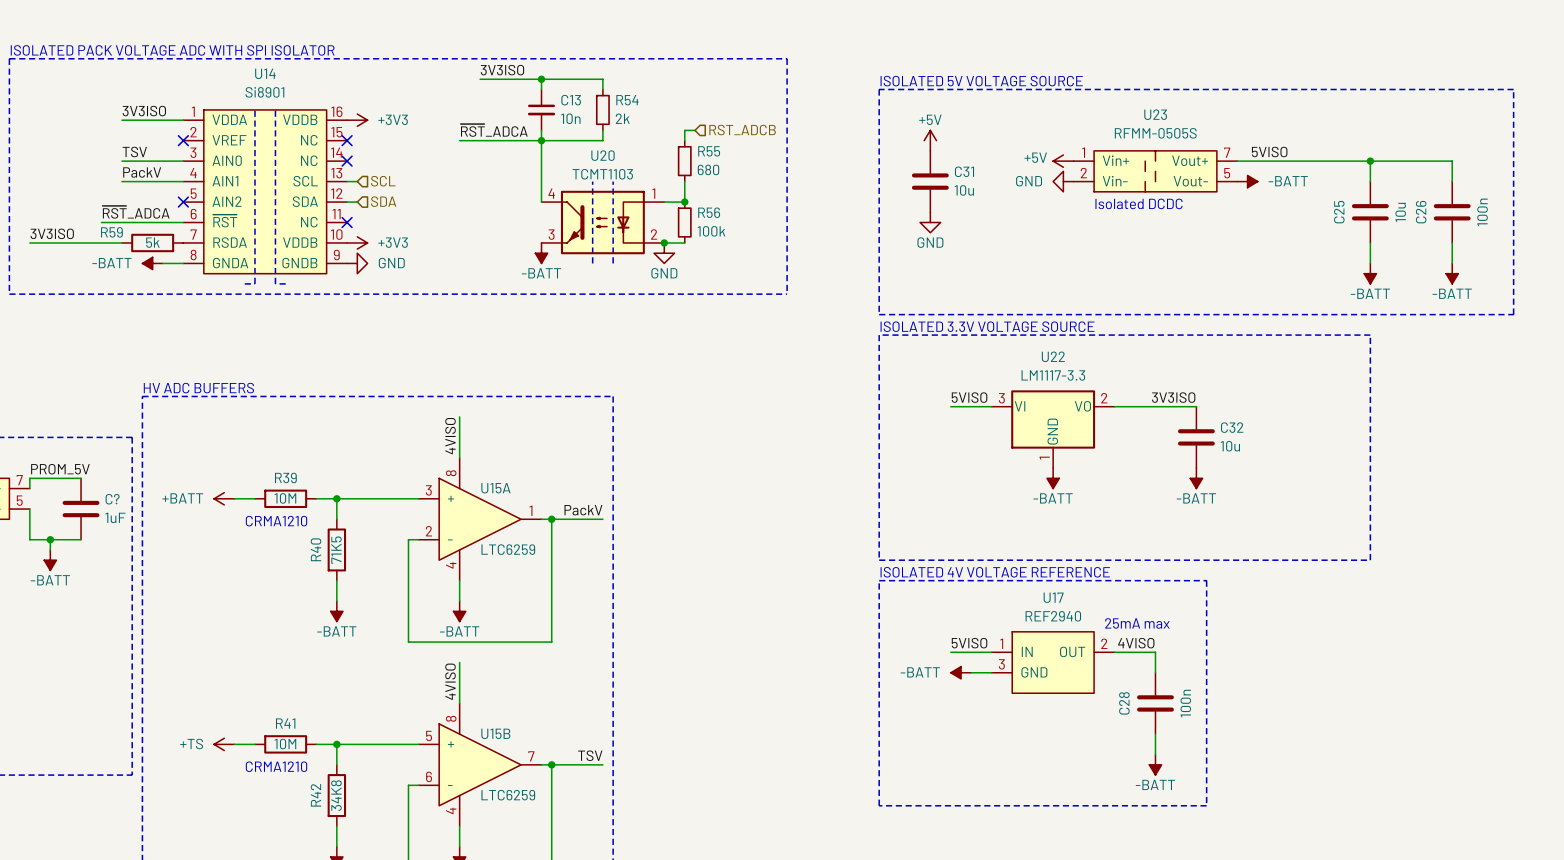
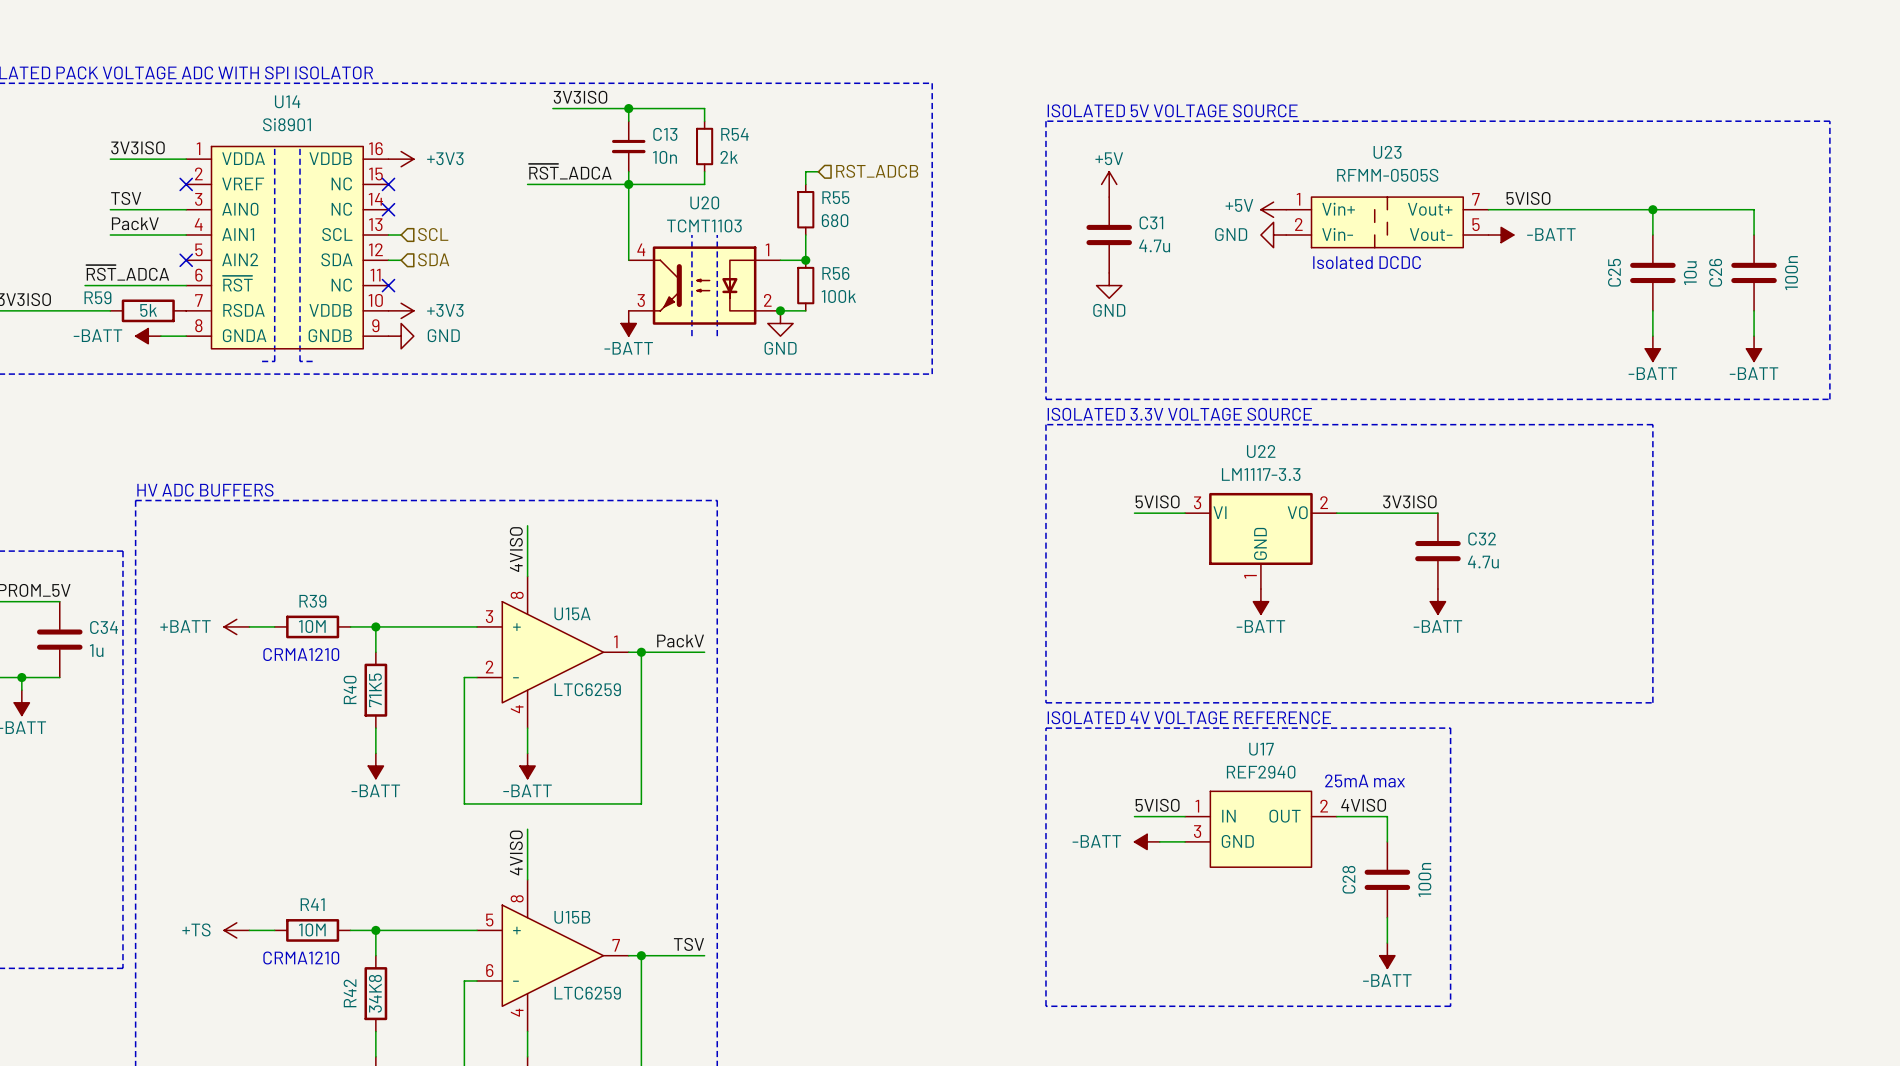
C31 value: 10u (964, 190) -> 4.7u (1154, 245)
C32 value: 10u (1230, 446) -> 4.7u (1483, 562)
C? name: C? (112, 499) -> C34 (104, 627)
C? value: 1uF (115, 517) -> 1u (96, 650)

